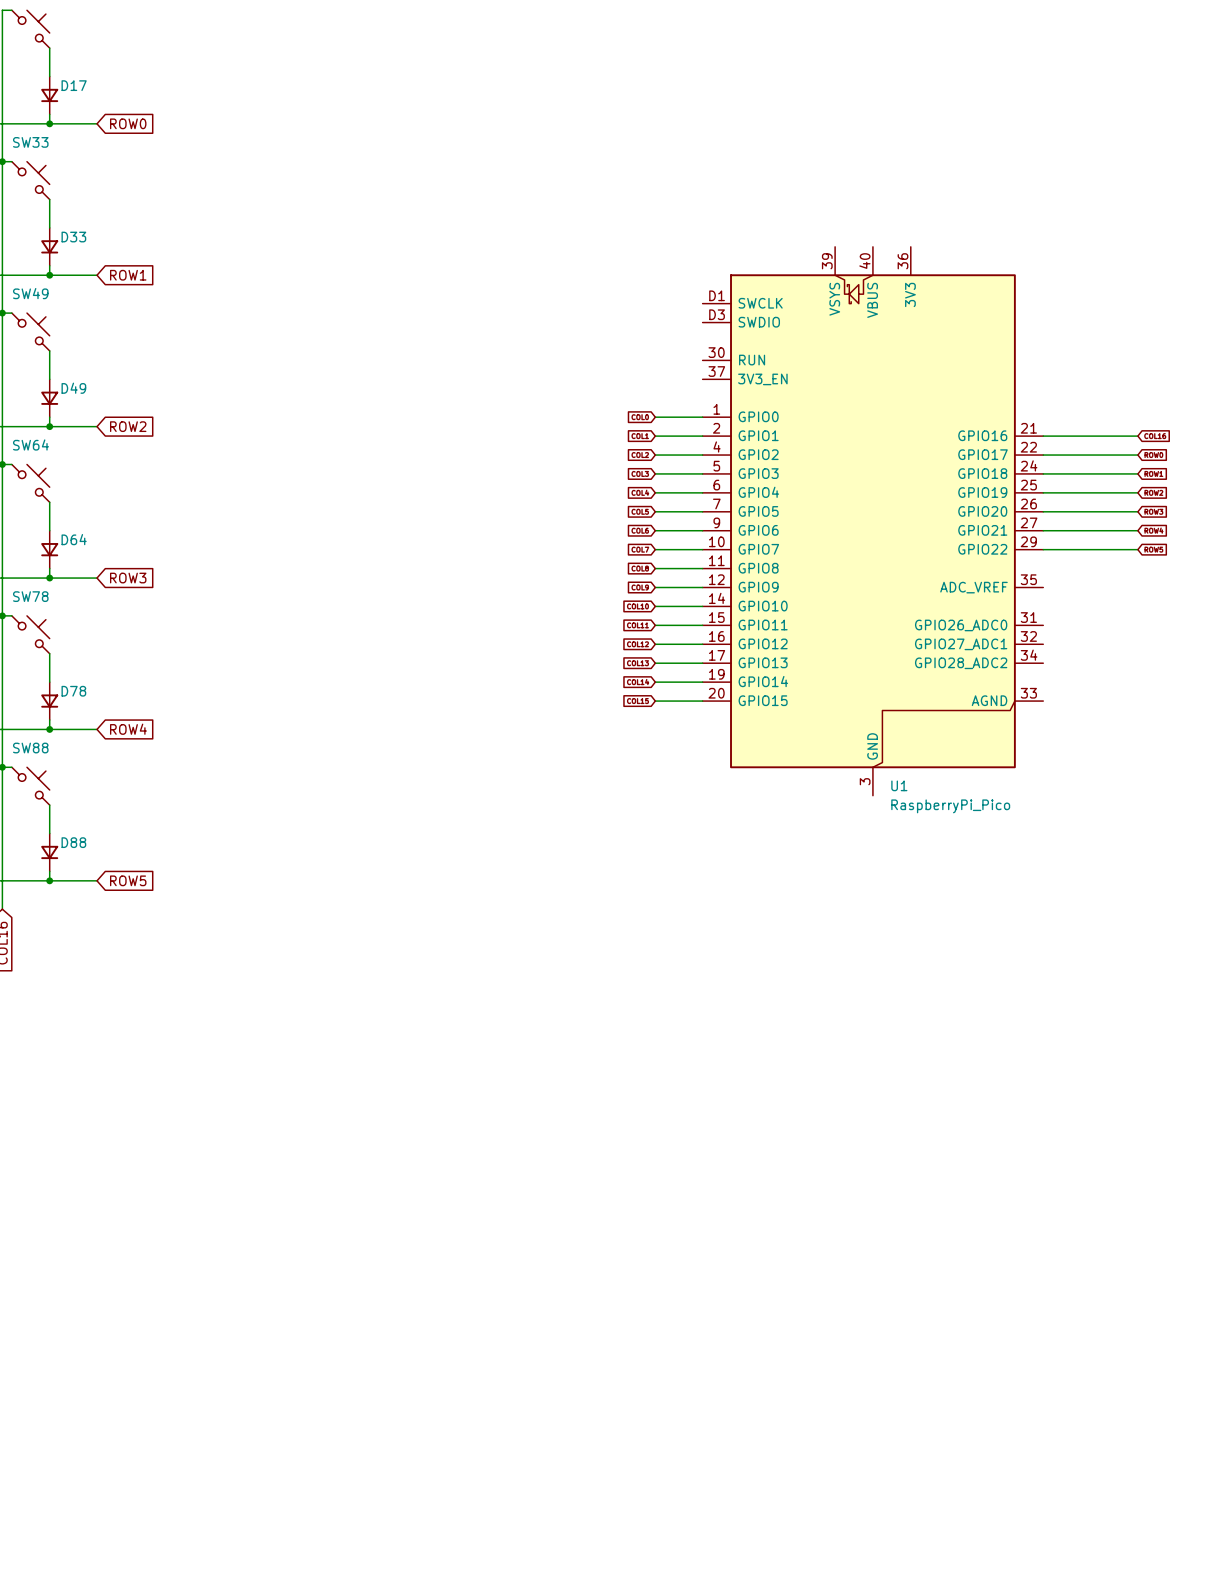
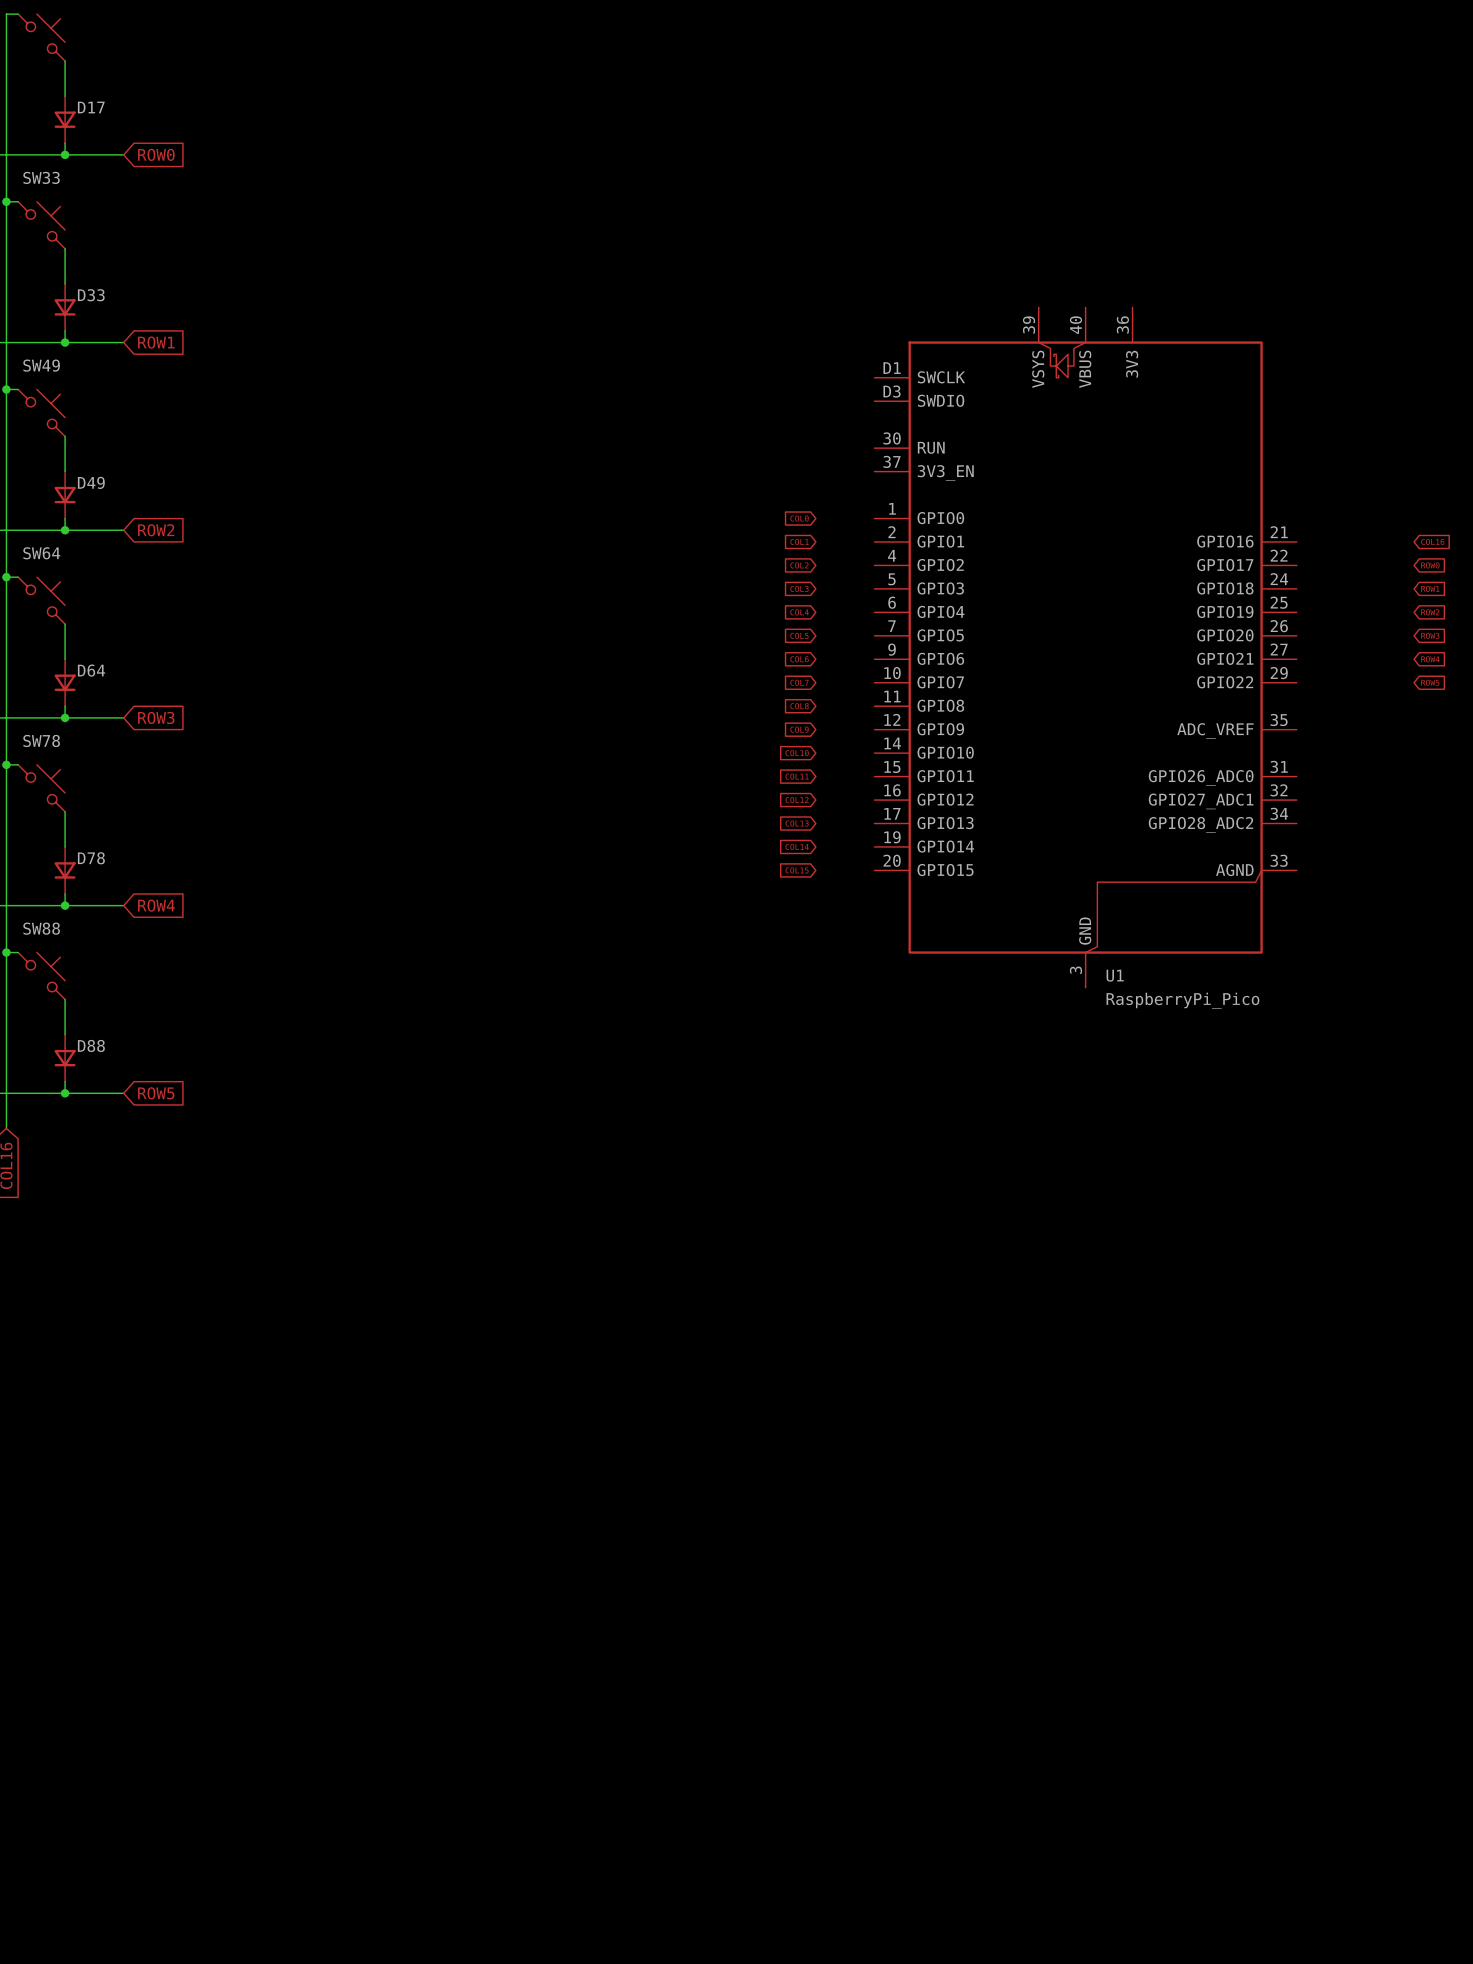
wire: (655, 417) (702, 417) -> none
wire: (655, 436) (702, 436) -> none
wire: (1043, 436) (1137, 436) -> none
wire: (655, 455) (702, 455) -> none
wire: (1043, 455) (1137, 455) -> none
wire: (655, 473) (702, 473) -> none
wire: (1043, 473) (1137, 473) -> none
wire: (655, 492) (702, 492) -> none
wire: (1043, 492) (1137, 492) -> none
wire: (655, 511) (702, 511) -> none
wire: (1043, 511) (1137, 511) -> none
wire: (655, 530) (702, 530) -> none
wire: (1043, 530) (1137, 530) -> none
wire: (655, 549) (702, 549) -> none
wire: (1043, 549) (1137, 549) -> none
wire: (655, 568) (702, 568) -> none
wire: (655, 587) (702, 587) -> none
wire: (655, 606) (702, 606) -> none
wire: (655, 625) (702, 625) -> none
wire: (655, 644) (702, 644) -> none
wire: (655, 663) (702, 663) -> none
wire: (655, 682) (702, 682) -> none
wire: (655, 701) (702, 701) -> none

